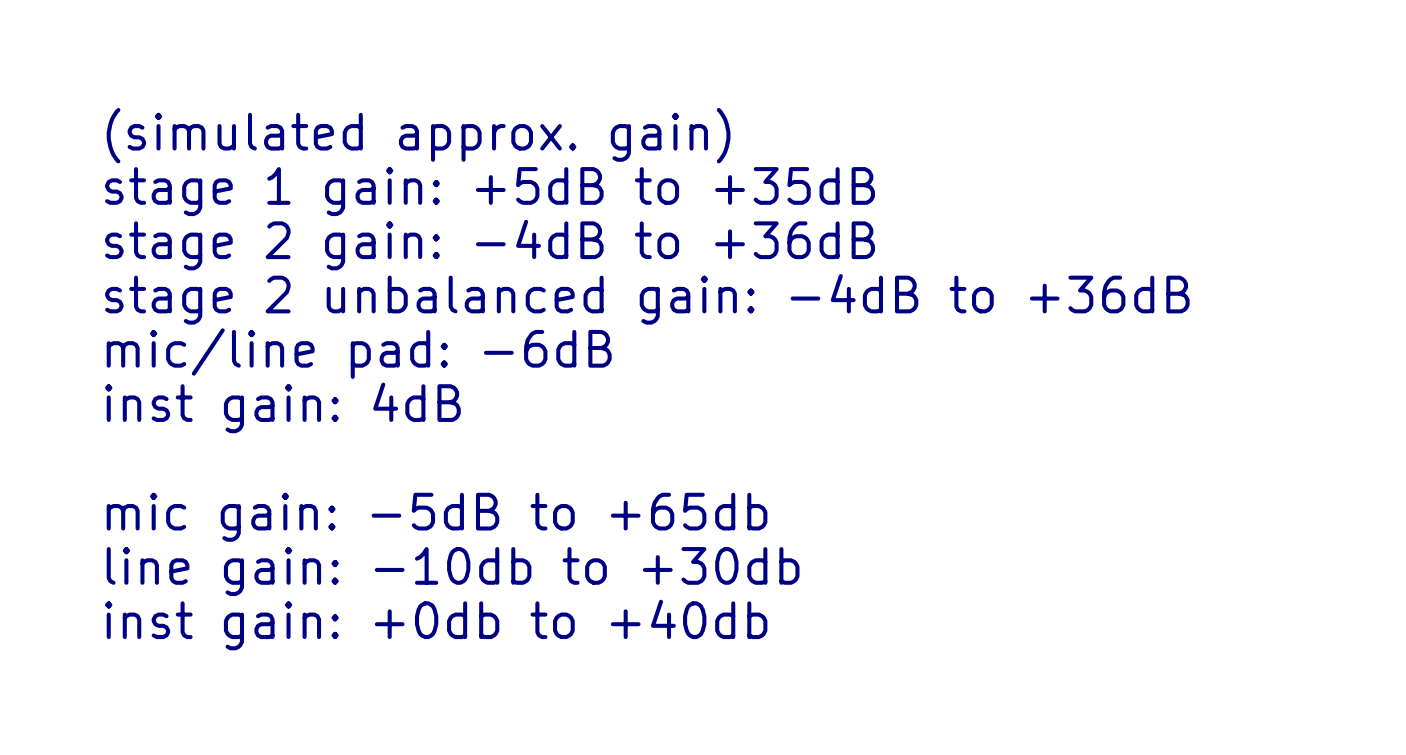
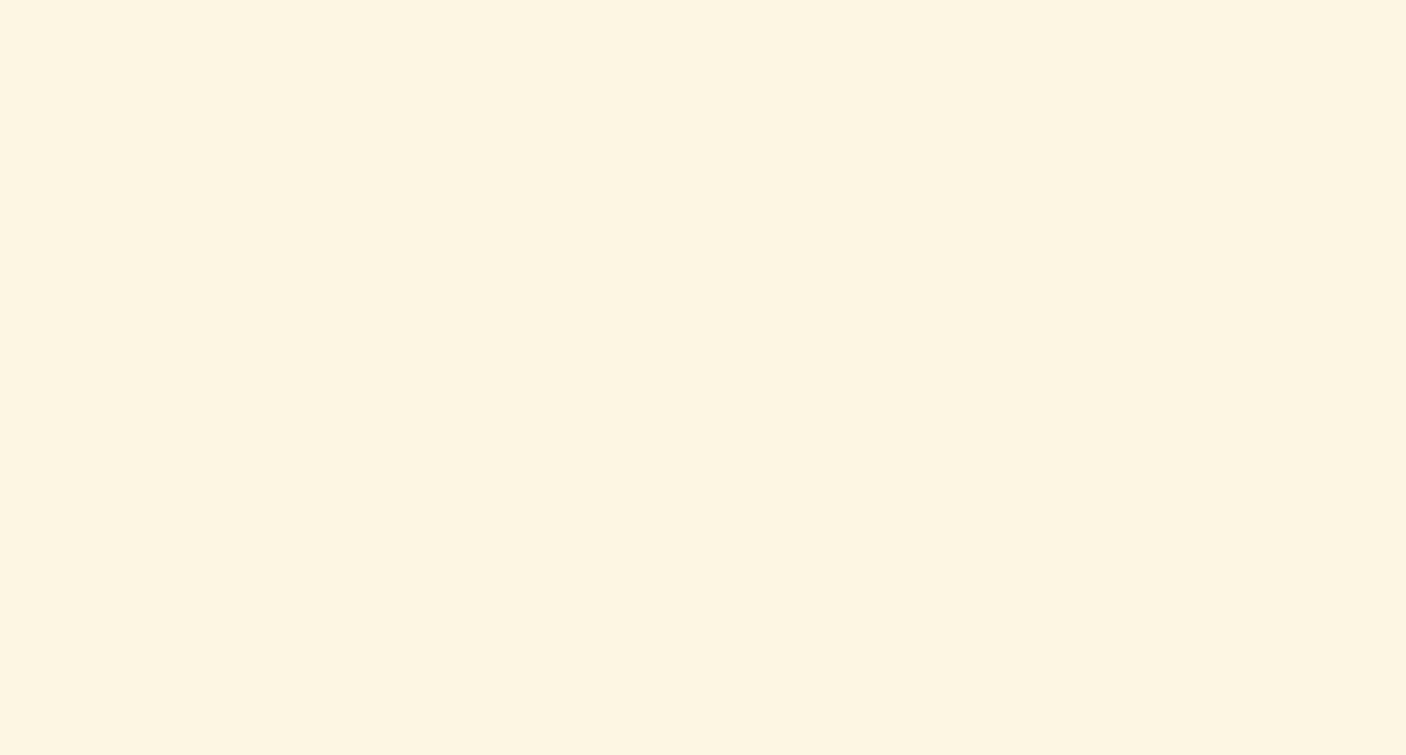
text: (simulated approx. gain) (418, 135) -> none
text: stage 1 gain: +5dB to +35dB (490, 191) -> none
text: stage 2 gain: -4dB to +36dB (490, 245) -> none
text: stage 2 unbalanced gain: -4dB to +36dB (647, 299) -> none
text: mic/line pad: -6dB (359, 353) -> none
text: inst gain: 4dB (282, 407) -> none
text: mic gain: -5dB to +65db (437, 517) -> none
text: line gain: -10db to +30db (453, 571) -> none
text: inst gain: +0db to +40db (436, 625) -> none

